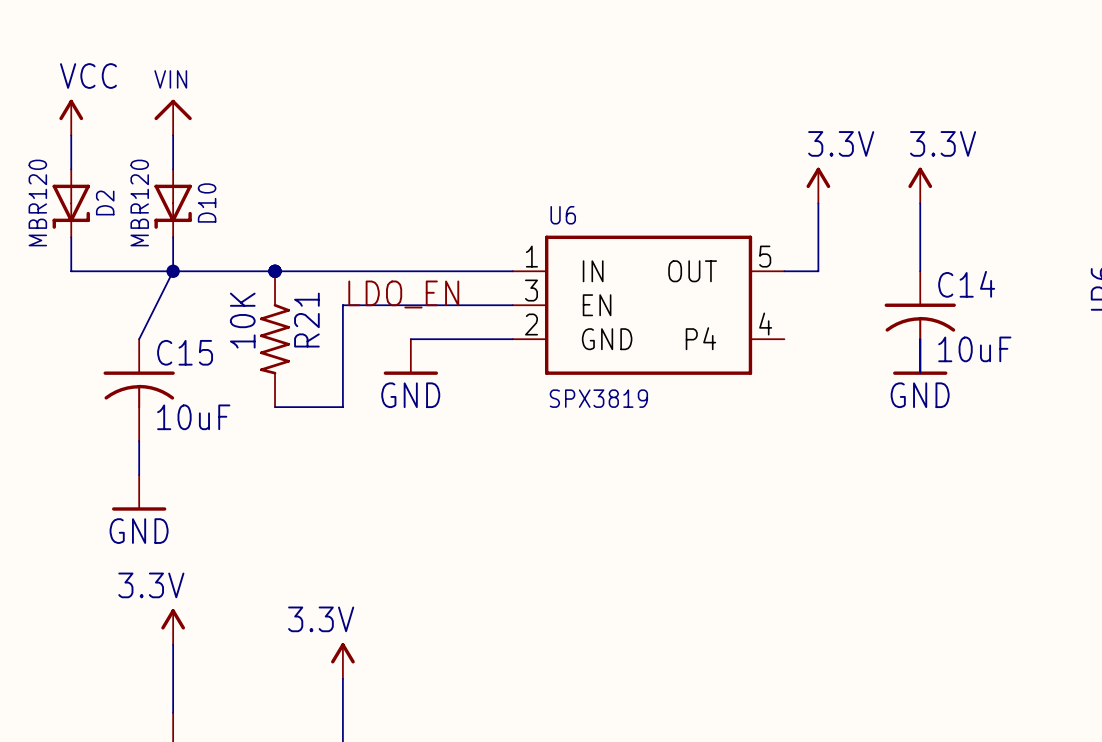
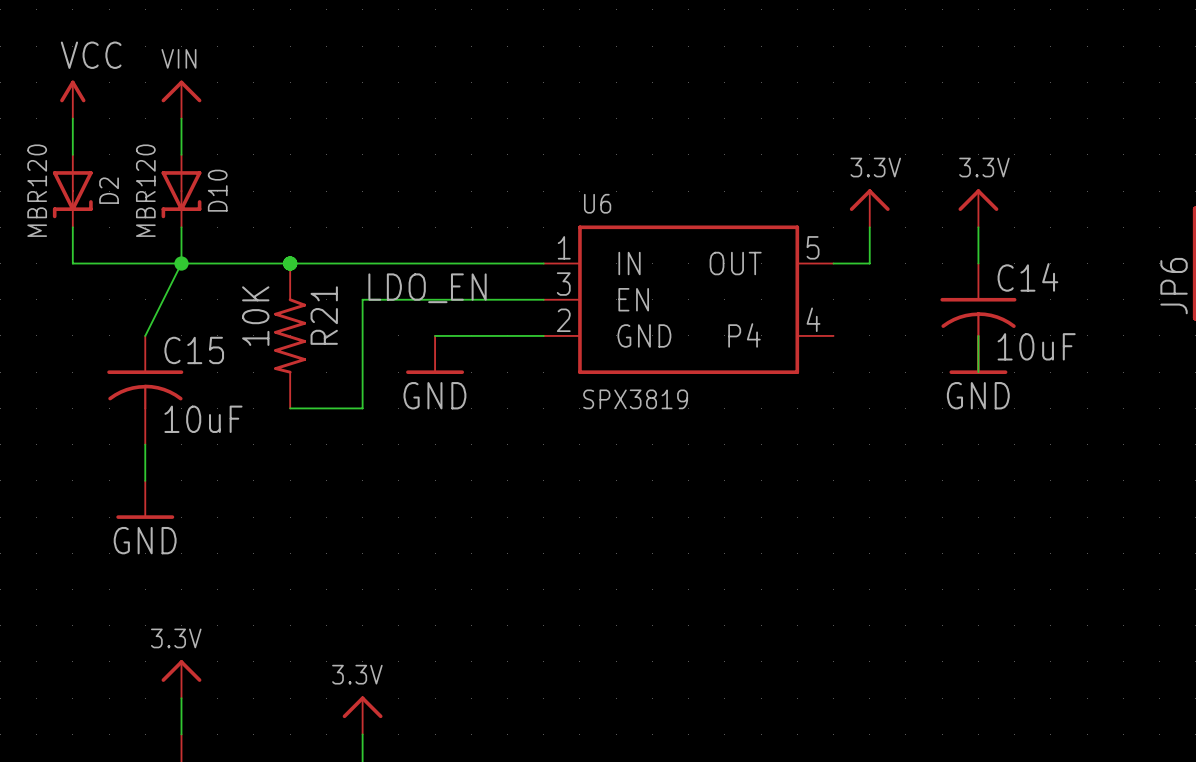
power symbol: 3.3V (818, 185) -> none
power symbol: 3.3V (920, 185) -> none
power symbol: none -> 3.3V (869, 208)
power symbol: none -> 3.3V (978, 208)
power symbol: 3.3V (173, 627) -> none
power symbol: none -> 3.3V (181, 679)
power symbol: 3.3V (342, 660) -> none
power symbol: none -> 3.3V (362, 715)

